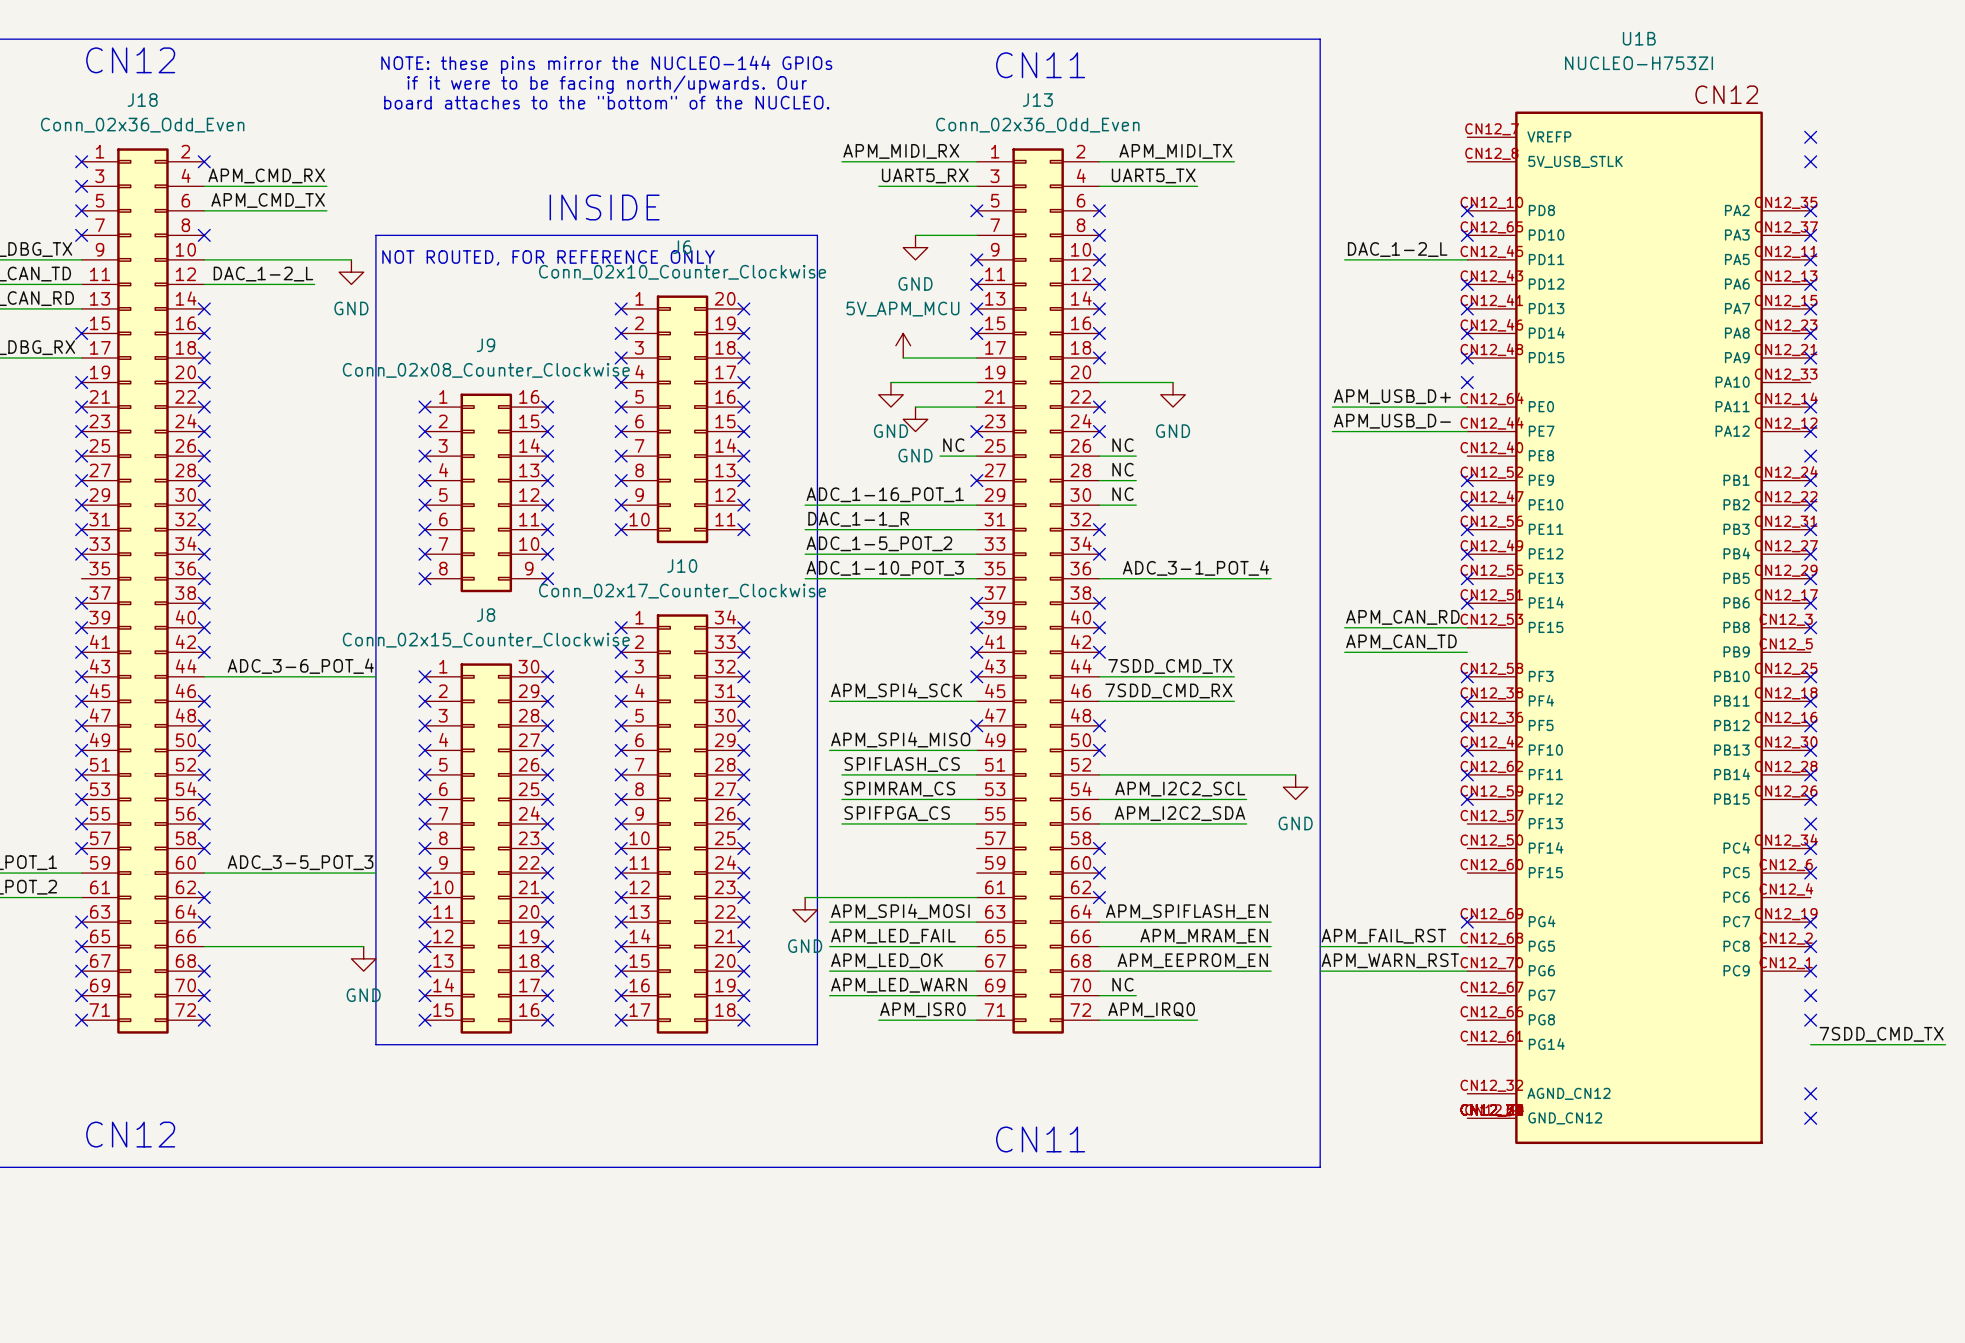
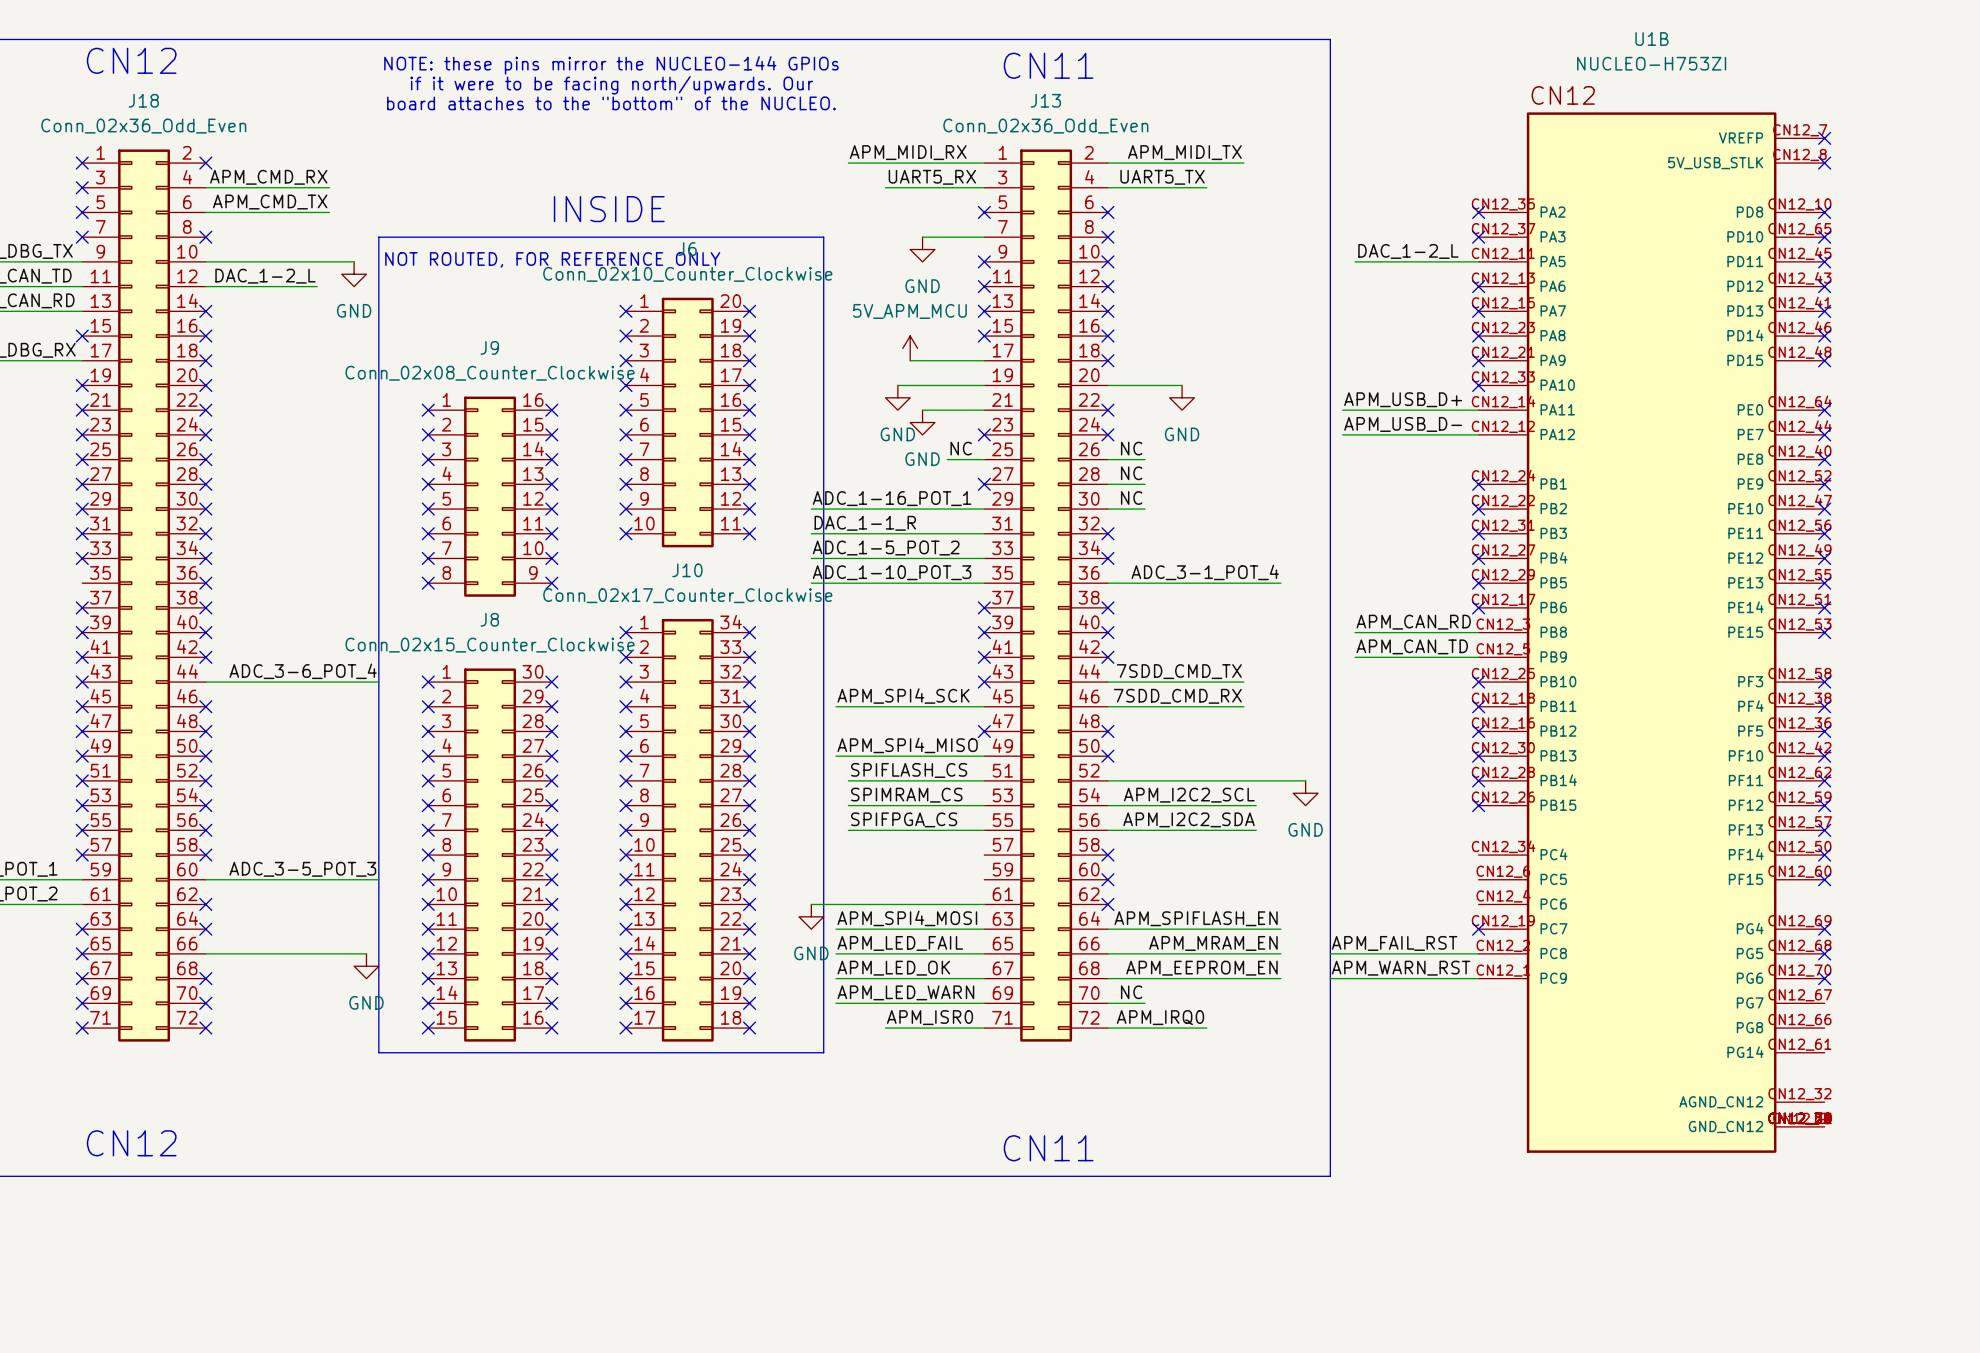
U1B flip: as is (1639, 627) -> left-right (1651, 632)
no-connect mark: (1810, 995) -> none
no-connect mark: (1810, 1020) -> none
label: 7SDD_CMD_TX (1881, 1034) -> none
wire: (1810, 1044) (1945, 1044) -> none
no-connect mark: (1810, 1093) -> none
no-connect mark: (1810, 1118) -> none

